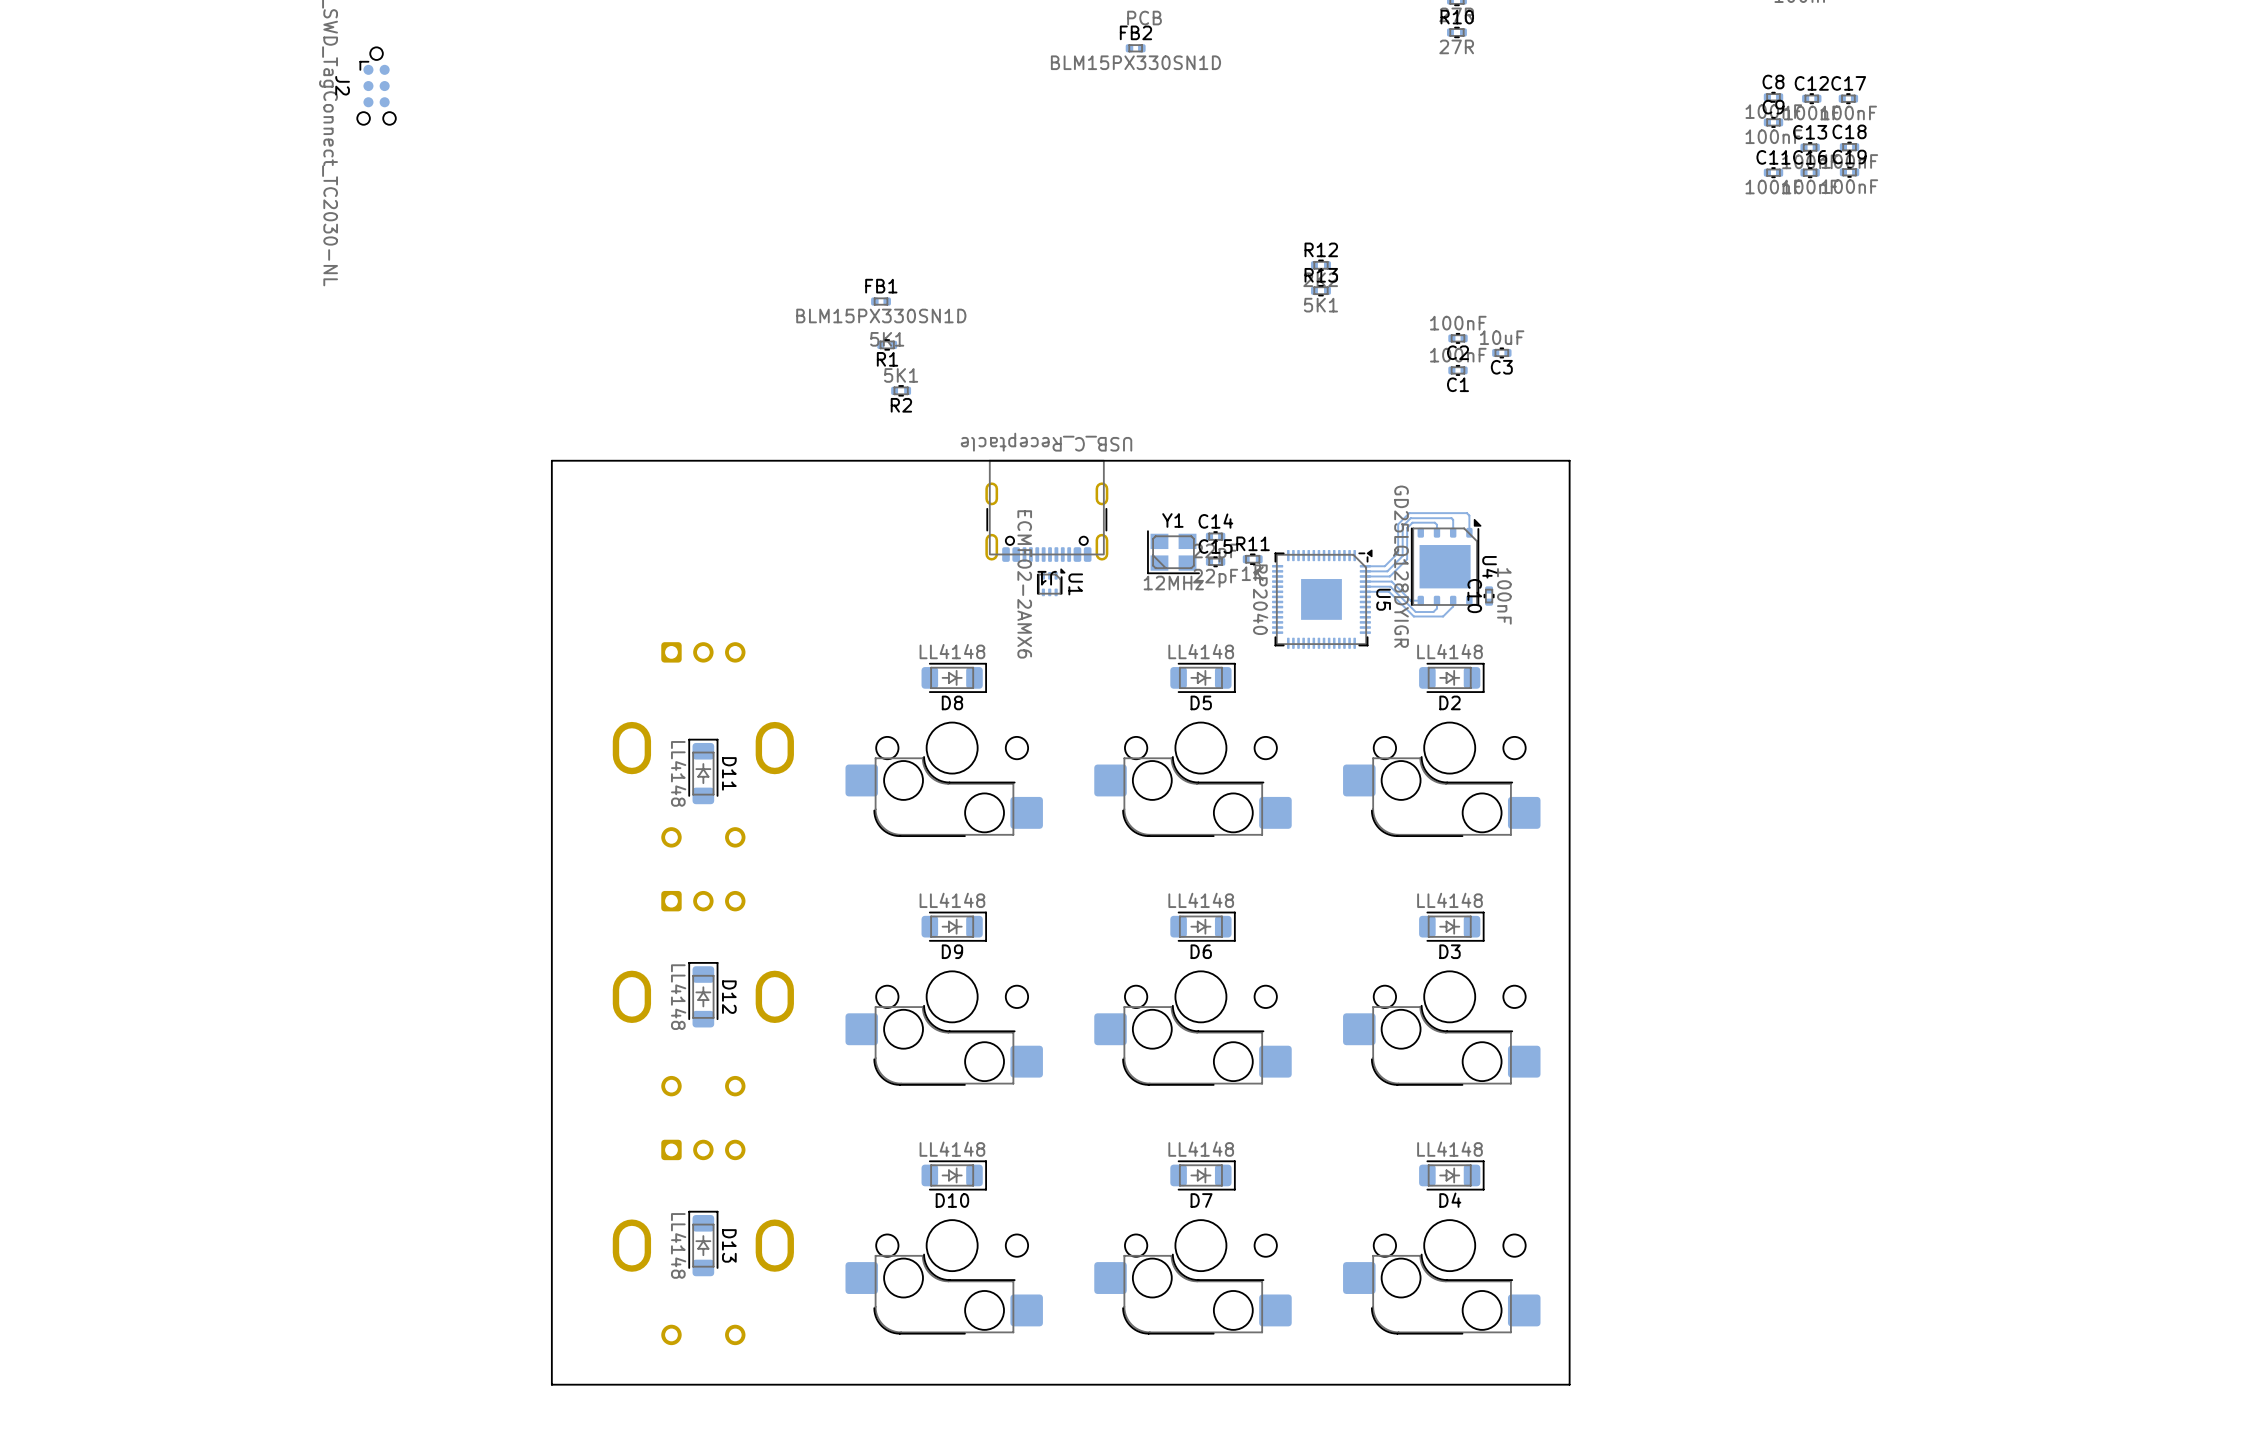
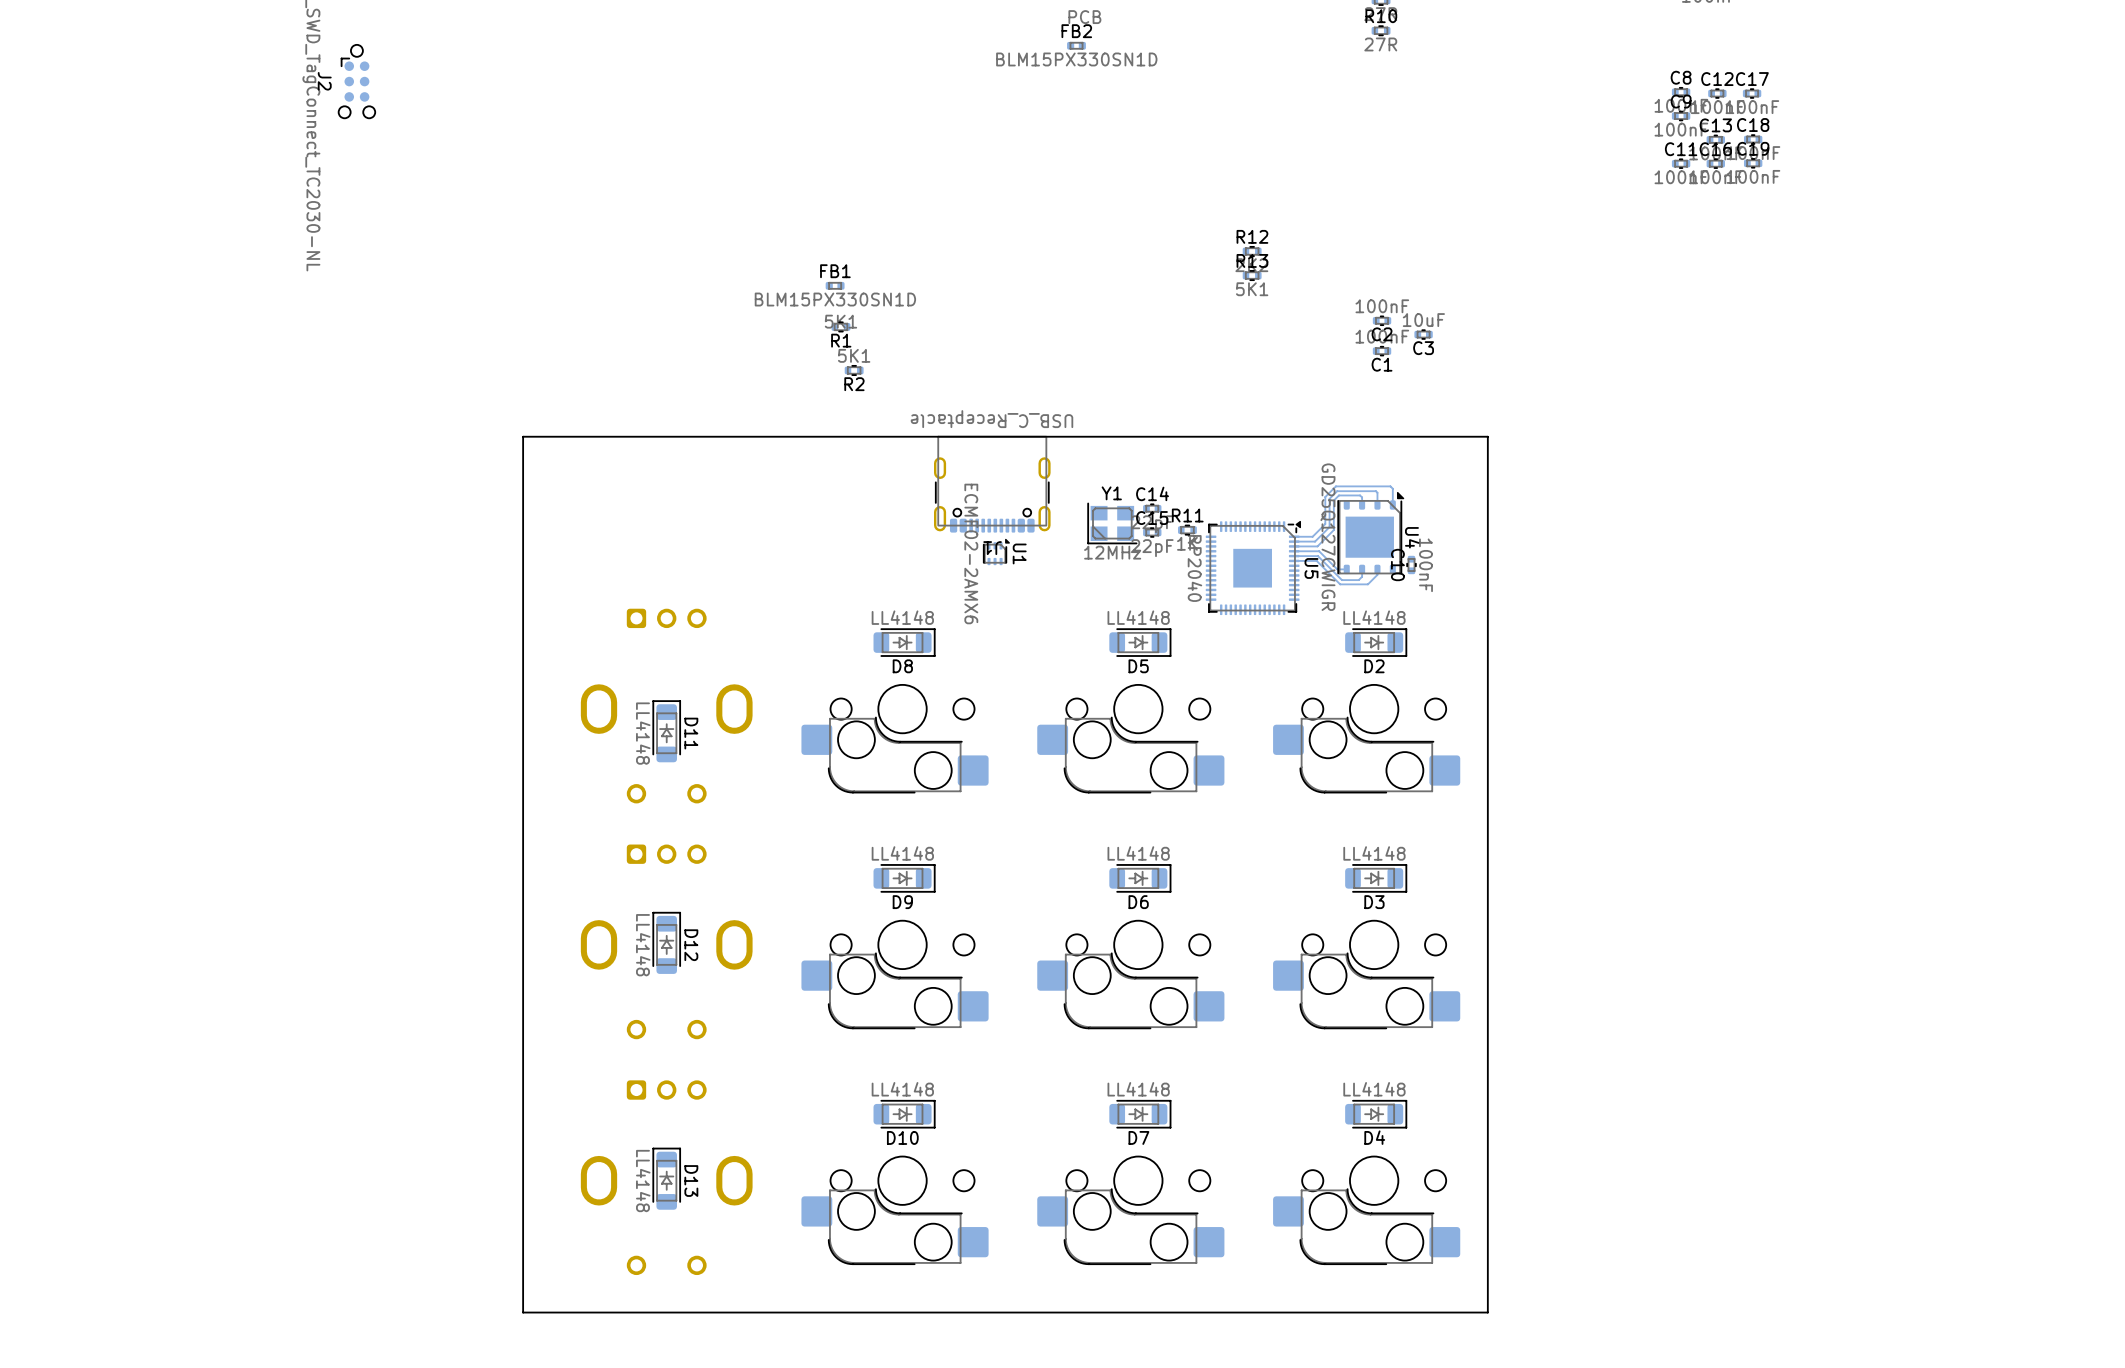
U4 value: GD25LQ128DYIGR (1400, 566) -> GD25Q127CWIGR (1327, 537)

